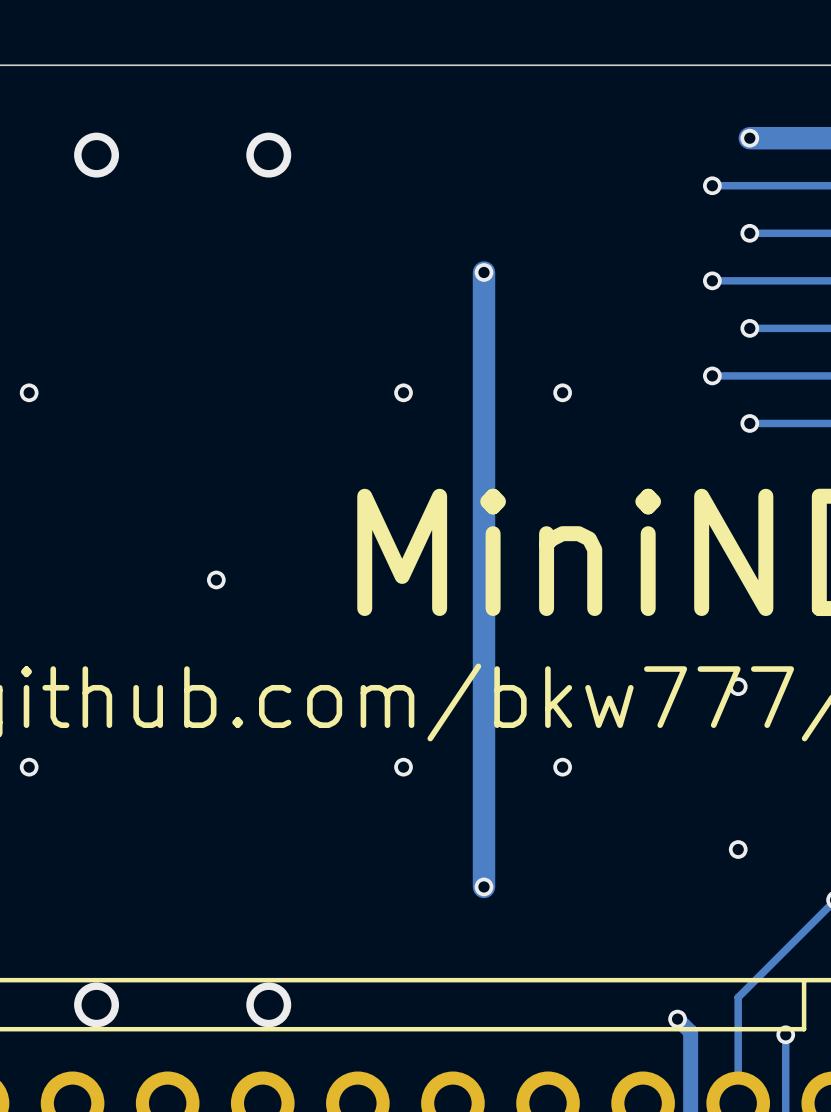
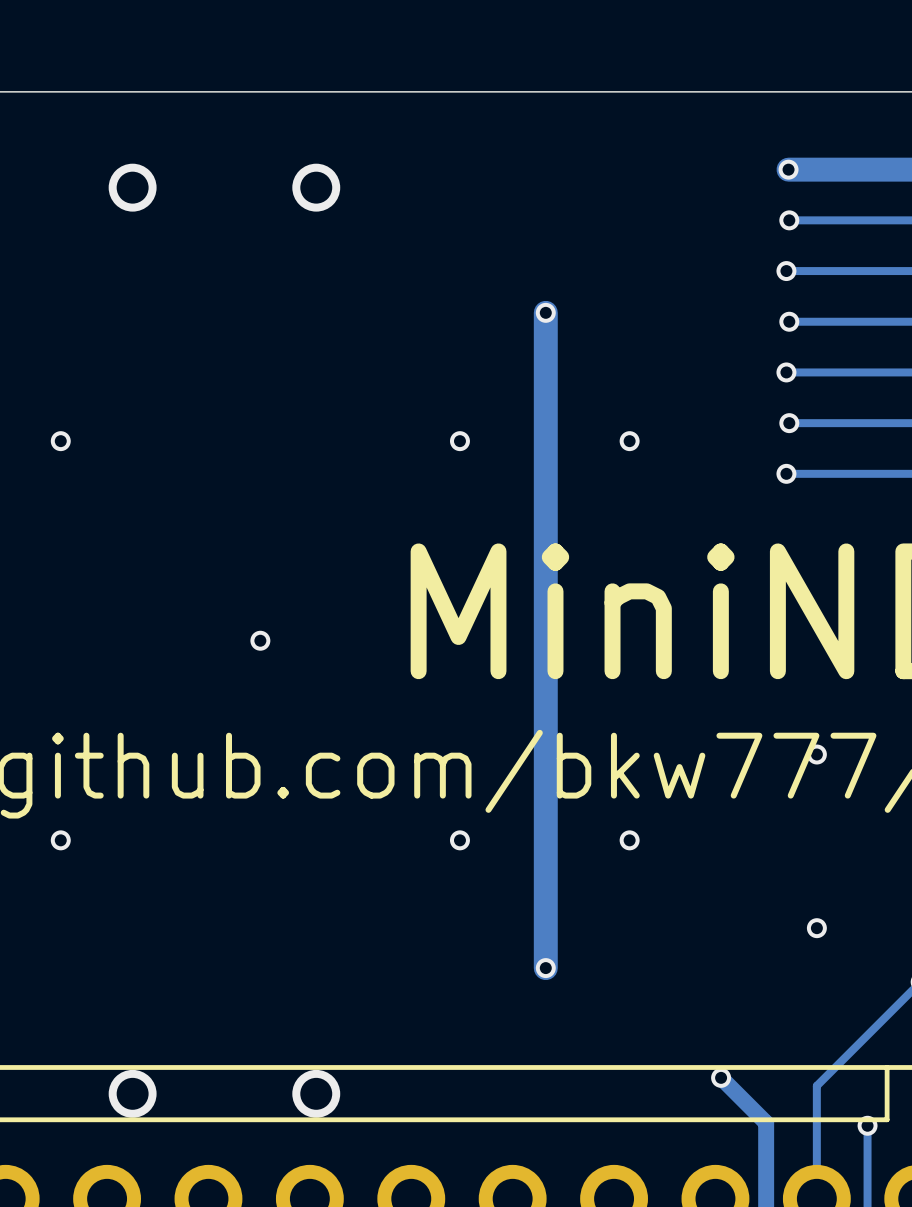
track: none -> (829, 169) (788, 169)
via position: (749, 138) -> (788, 169)
track: none -> (829, 271) (786, 271)
via position: (749, 233) -> (786, 271)
track: none -> (829, 372) (786, 372)
via position: (749, 328) -> (786, 372)
track: none -> (829, 473) (786, 473)
via position: (749, 423) -> (786, 473)
track: none -> (721, 1077) (752, 1108)
via position: (677, 1019) -> (721, 1077)

